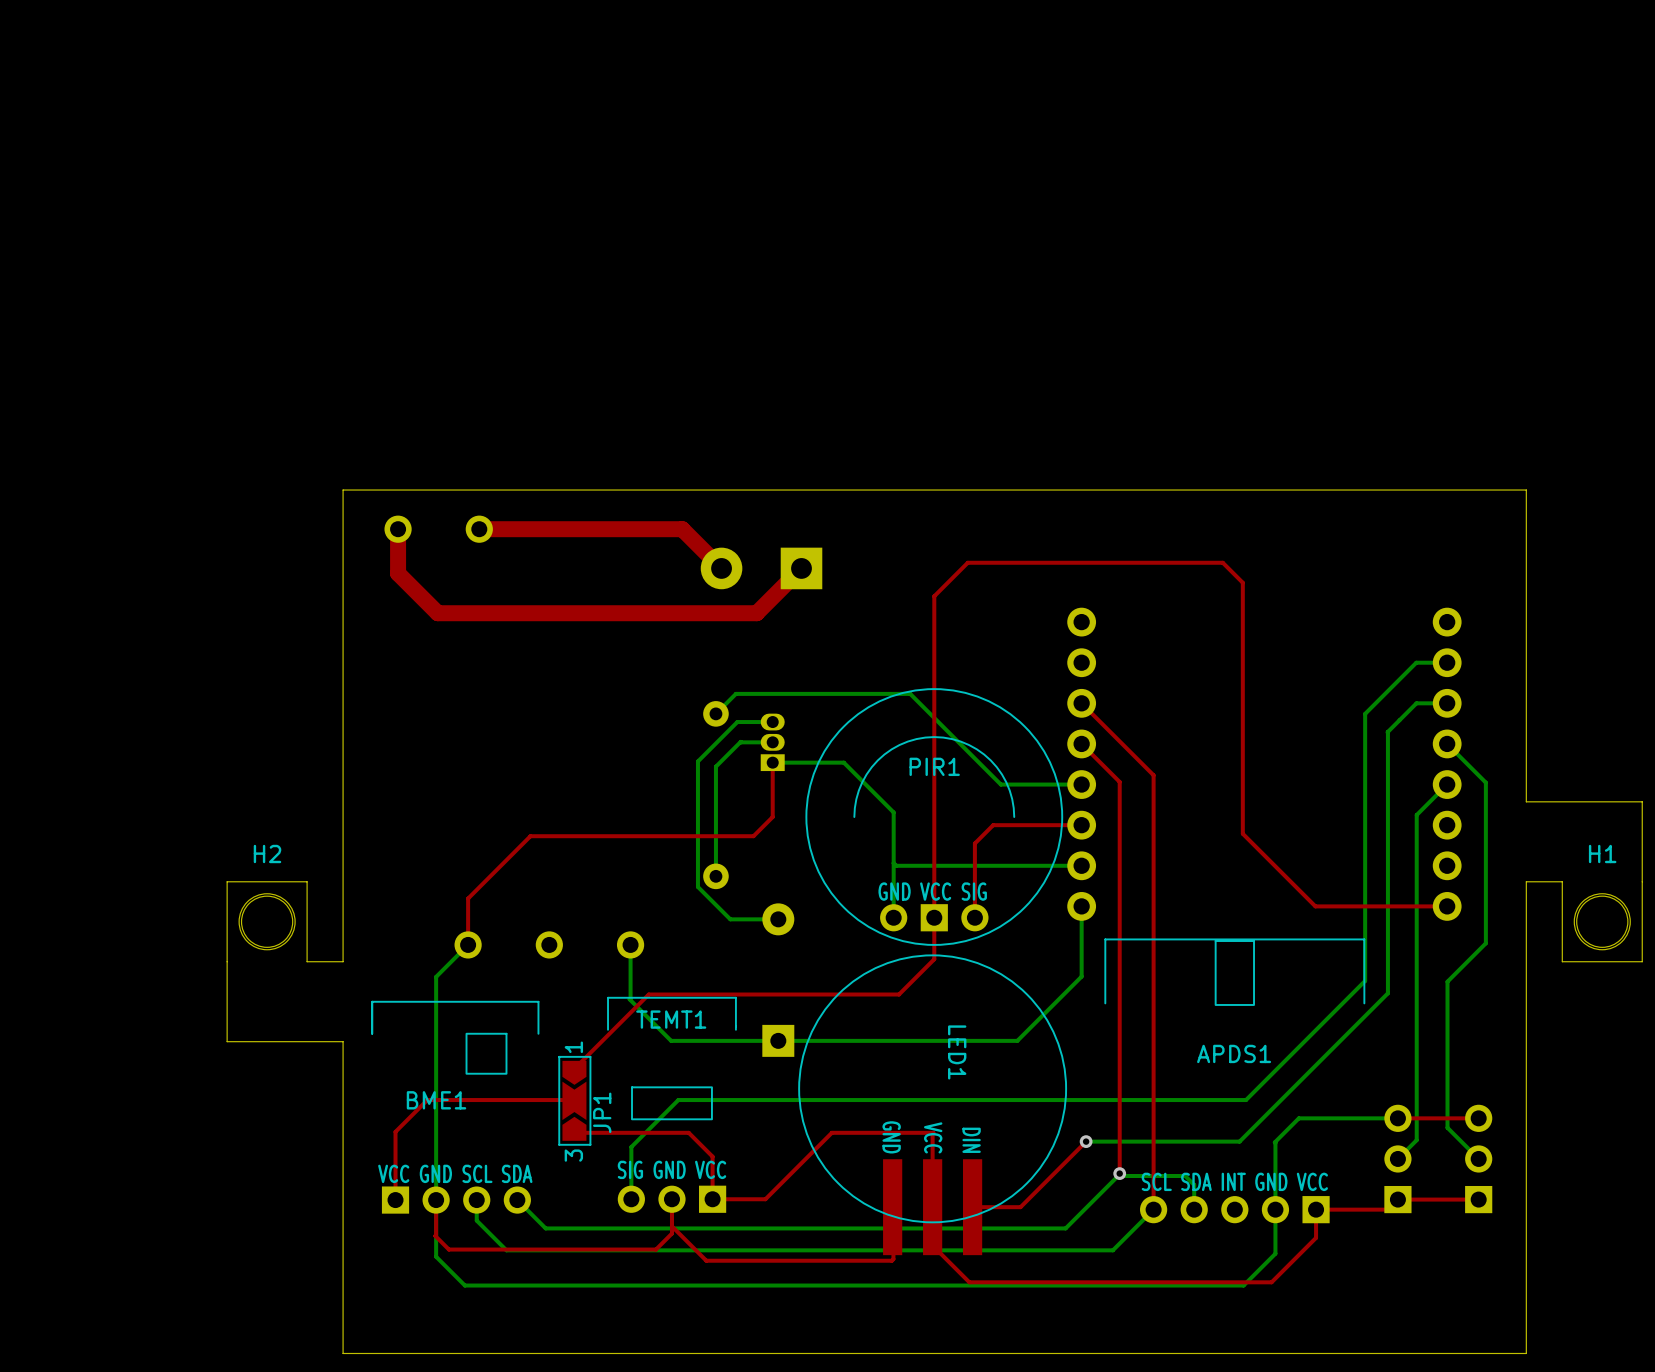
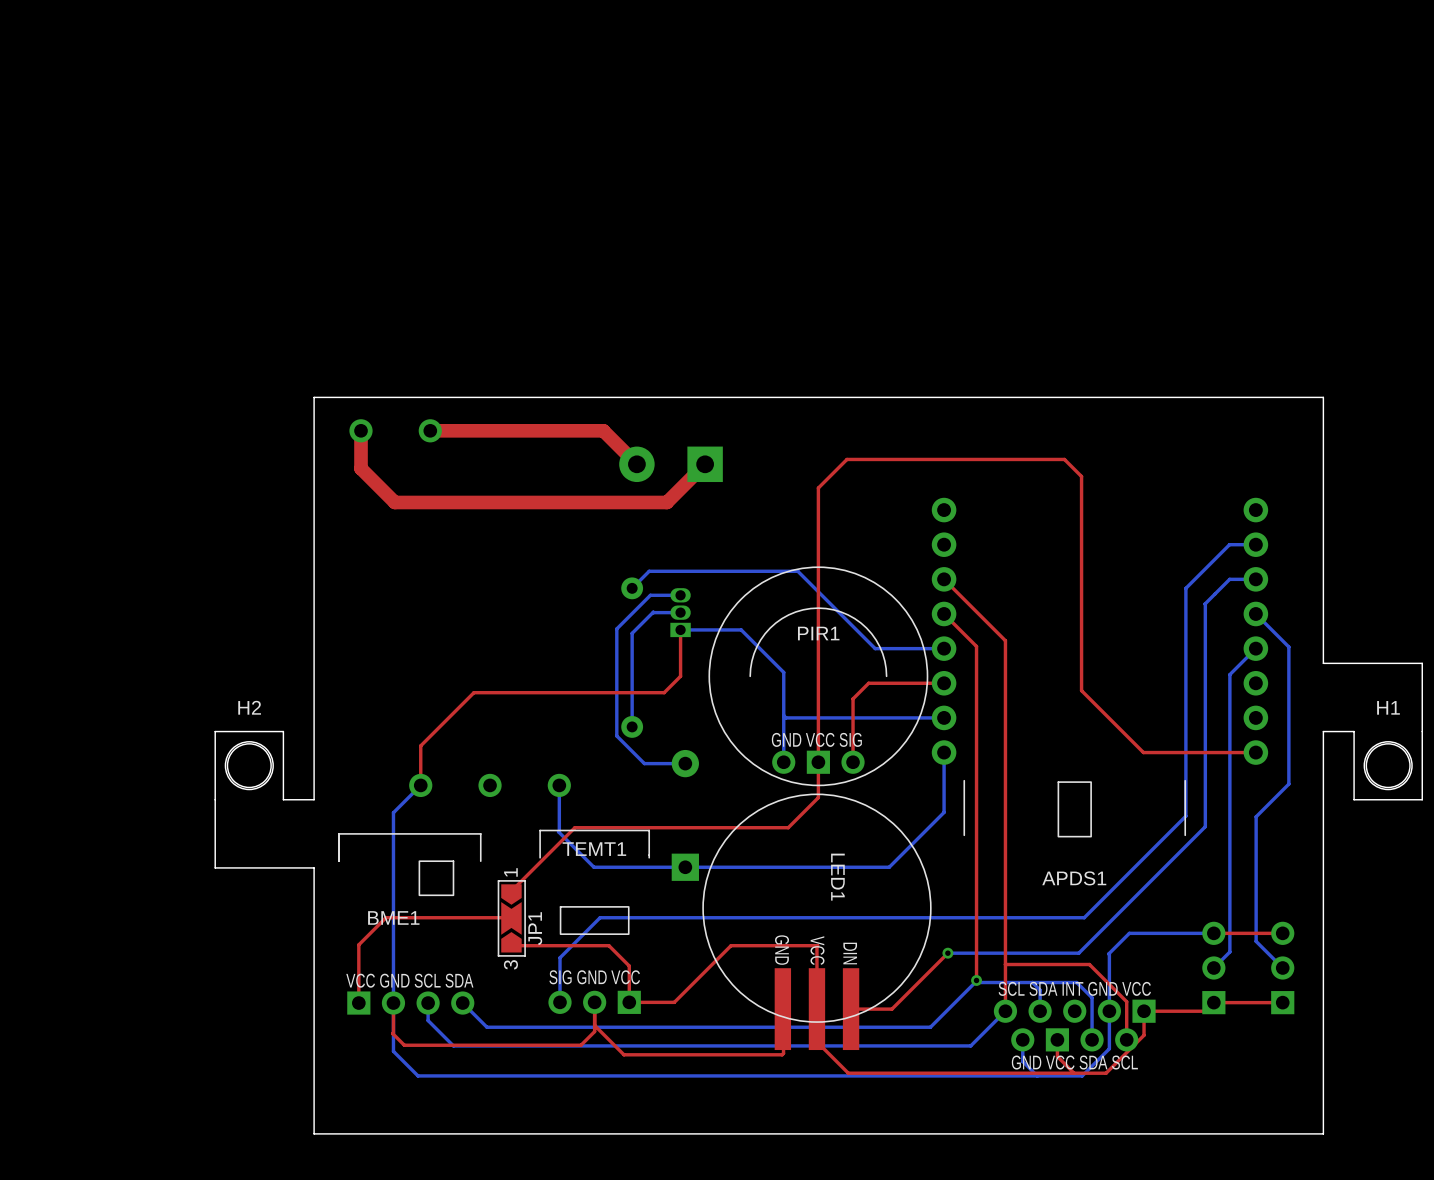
APDS1 footprint: [1104, 938, 1366, 1224] -> [963, 779, 1187, 1052]
top track: none -> (1005, 964) (1089, 964) (1126, 1001) (1126, 1039)
bottom track: none -> (1032, 982) (1076, 982) (1092, 997) (1092, 1039)
bottom track: none -> (1022, 1039) (1022, 1061) (1037, 1075)
top track: none -> (1057, 1039) (1057, 1056) (1074, 1073)

